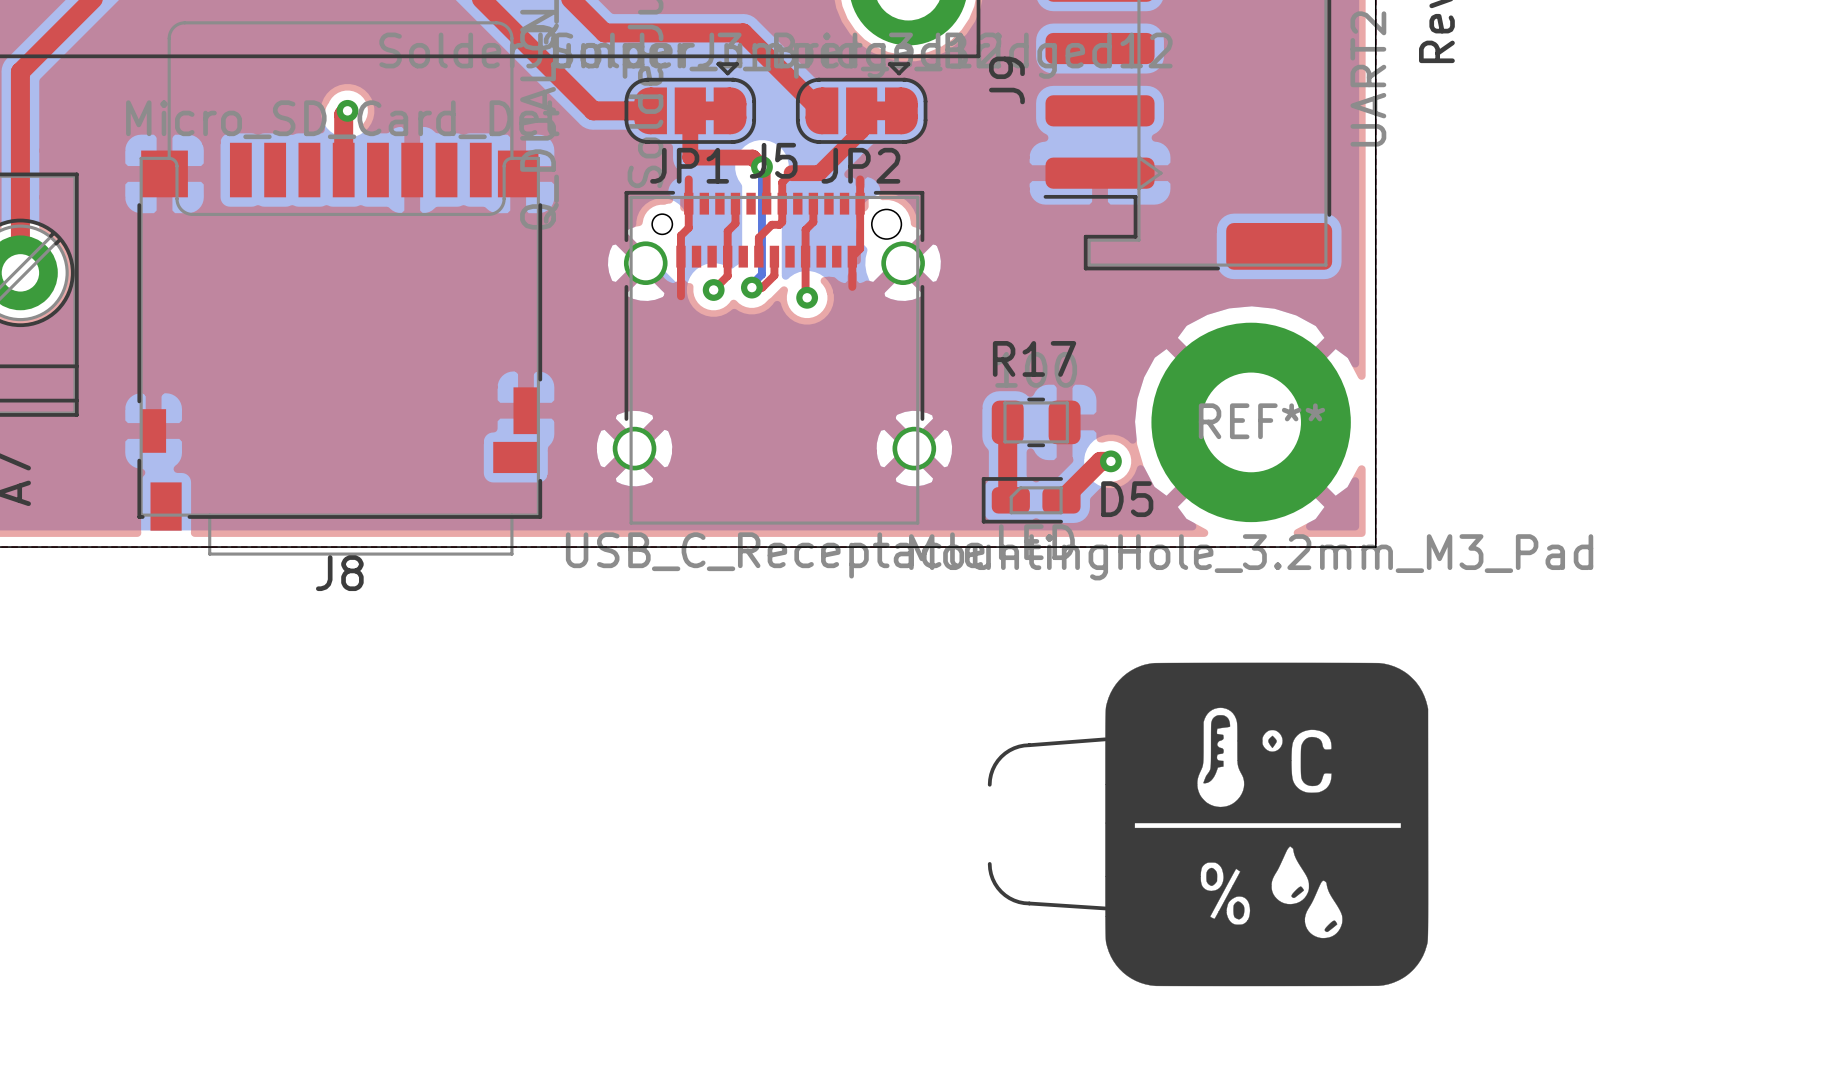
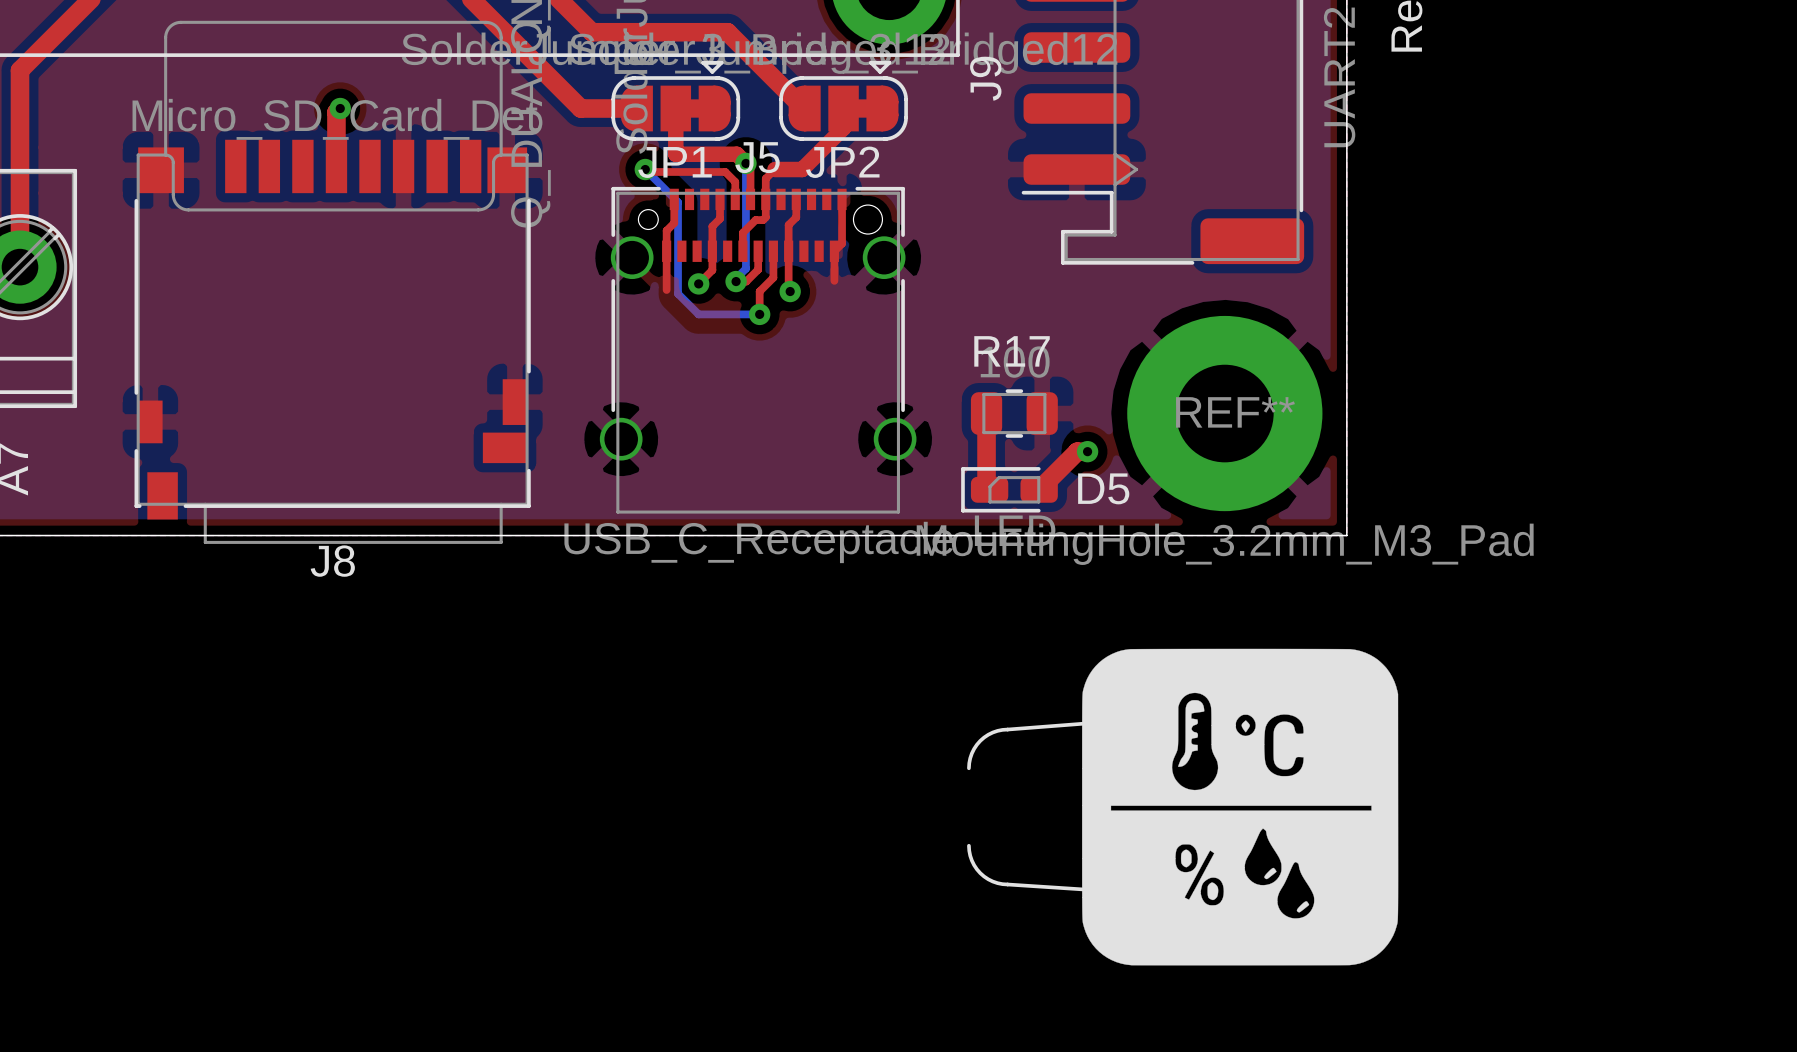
top track: none -> (645, 169) (647, 171) (725, 171) (735, 181) (735, 199)
bottom track: none -> (645, 169) (678, 202) (678, 293) (698, 314) (759, 314)
via: none -> (645, 169)
top track: (688, 179) (688, 203) -> none
top track: (860, 179) (860, 203) -> none
top track: none -> (773, 251) (773, 277) (759, 291) (759, 314)
via: none -> (759, 314)

